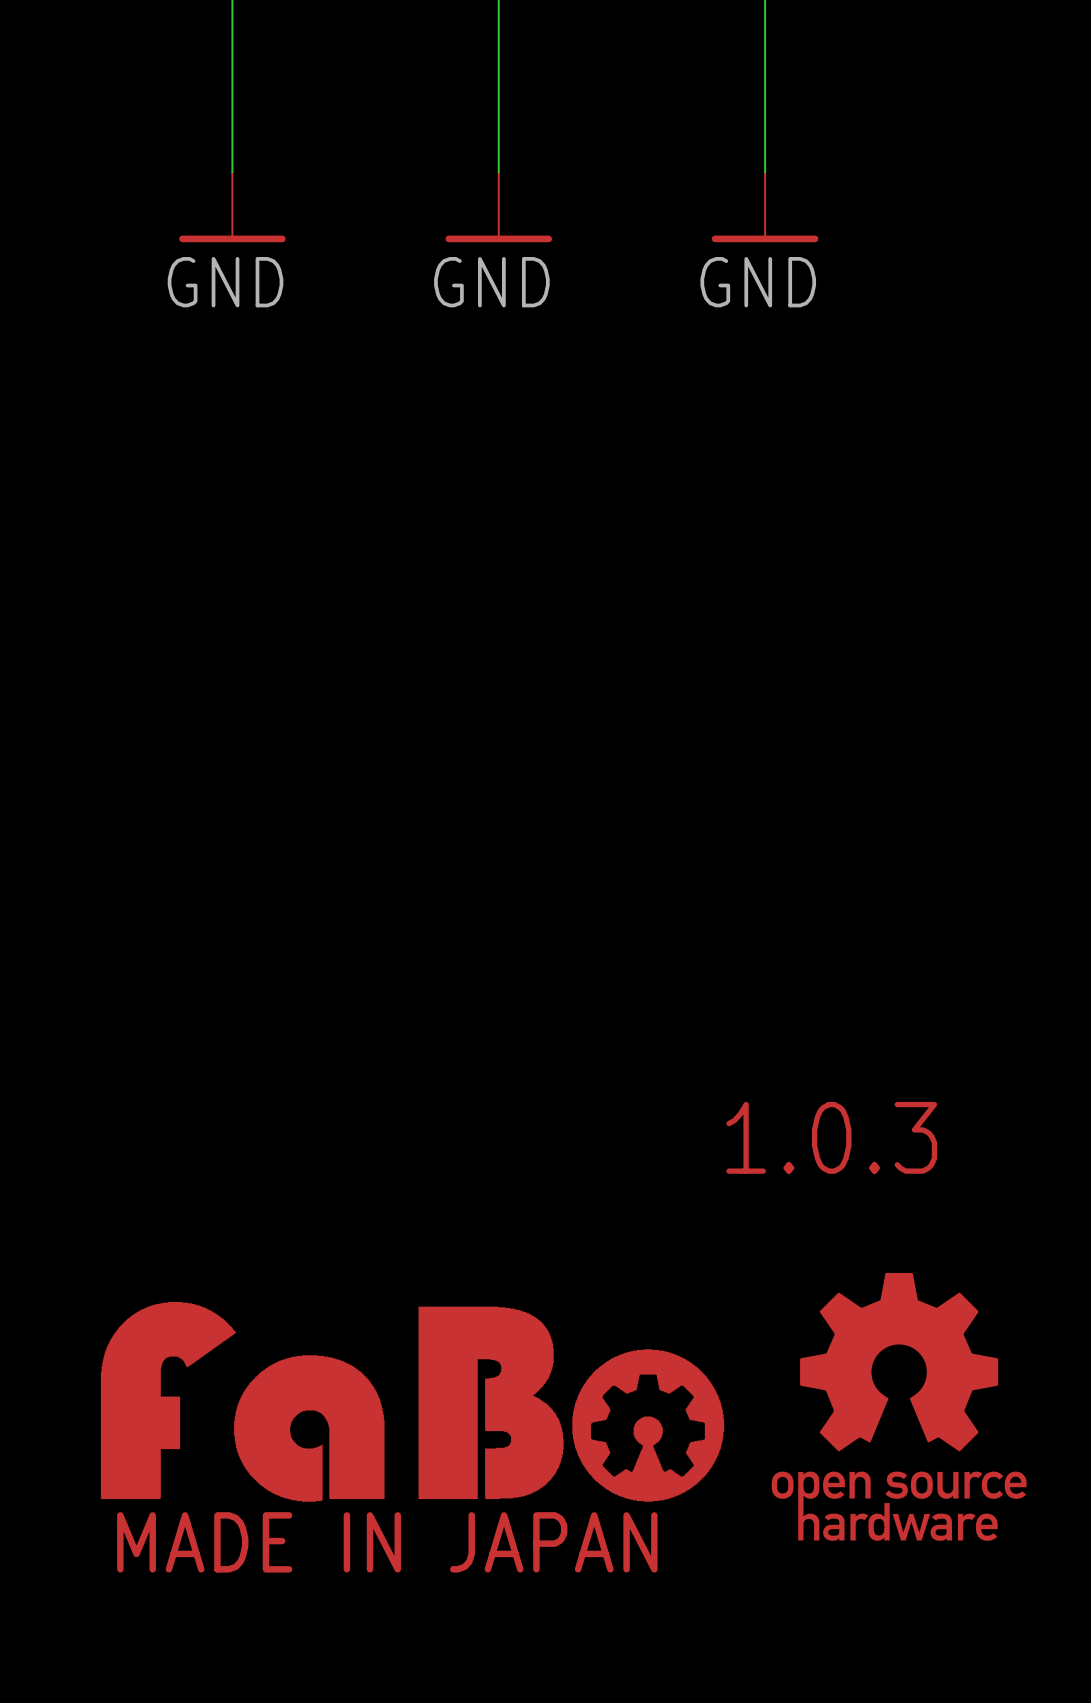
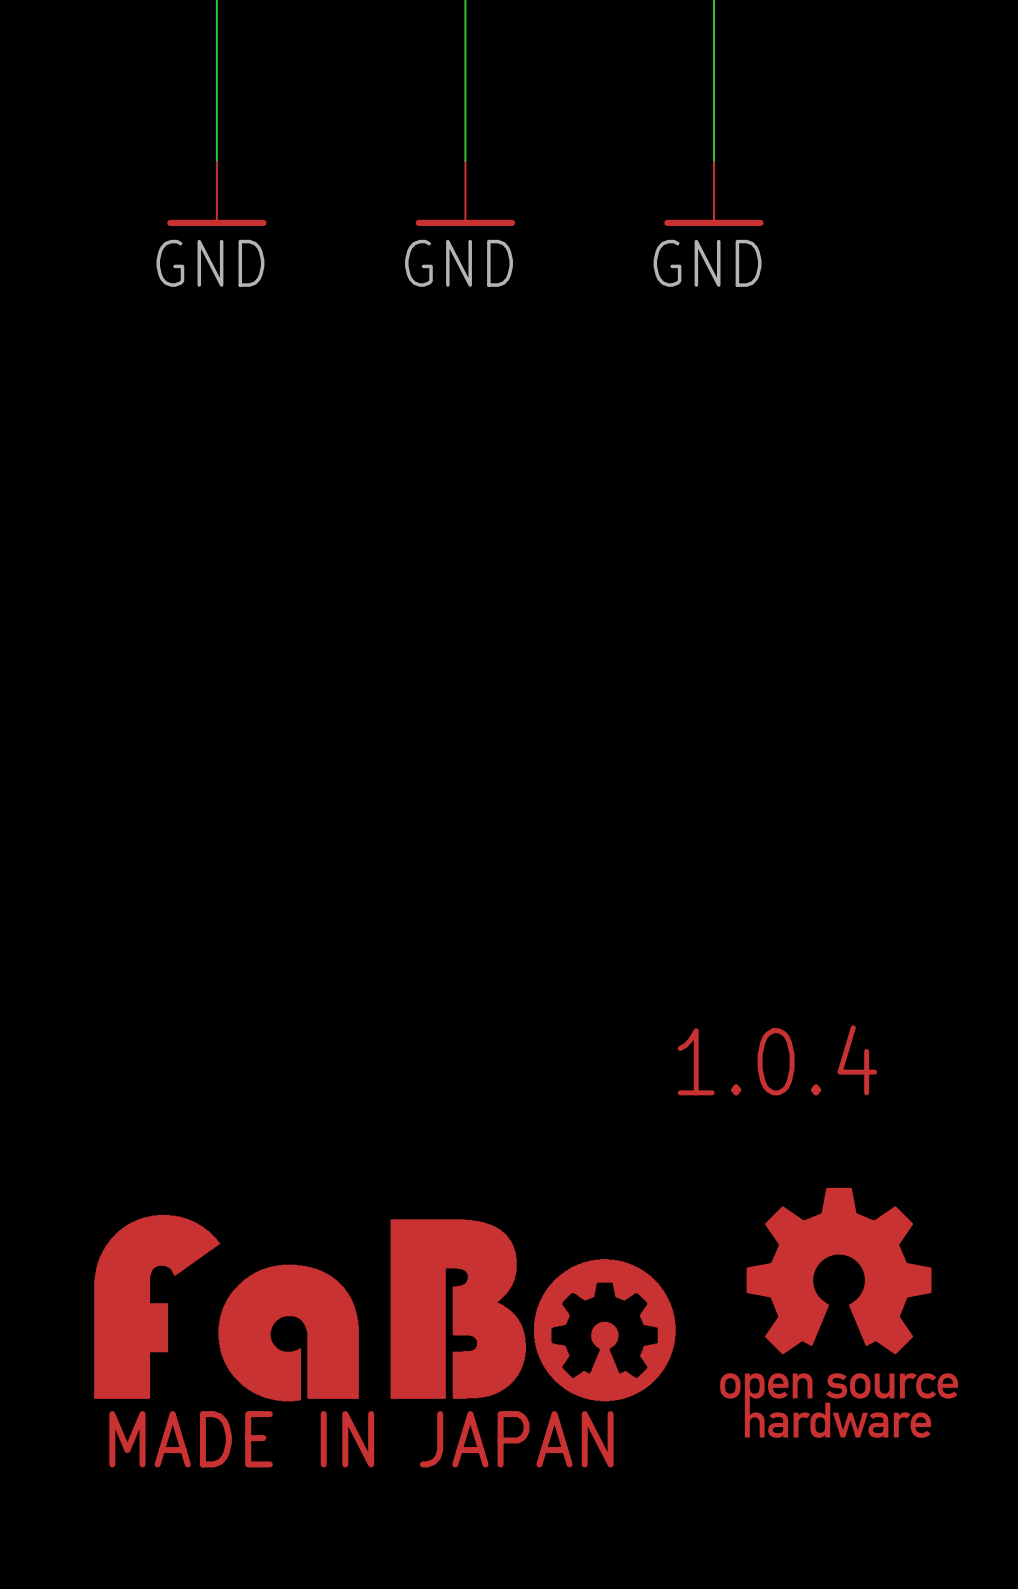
text: 1.0.3 (831, 1137) -> 1.0.4 (777, 1060)

